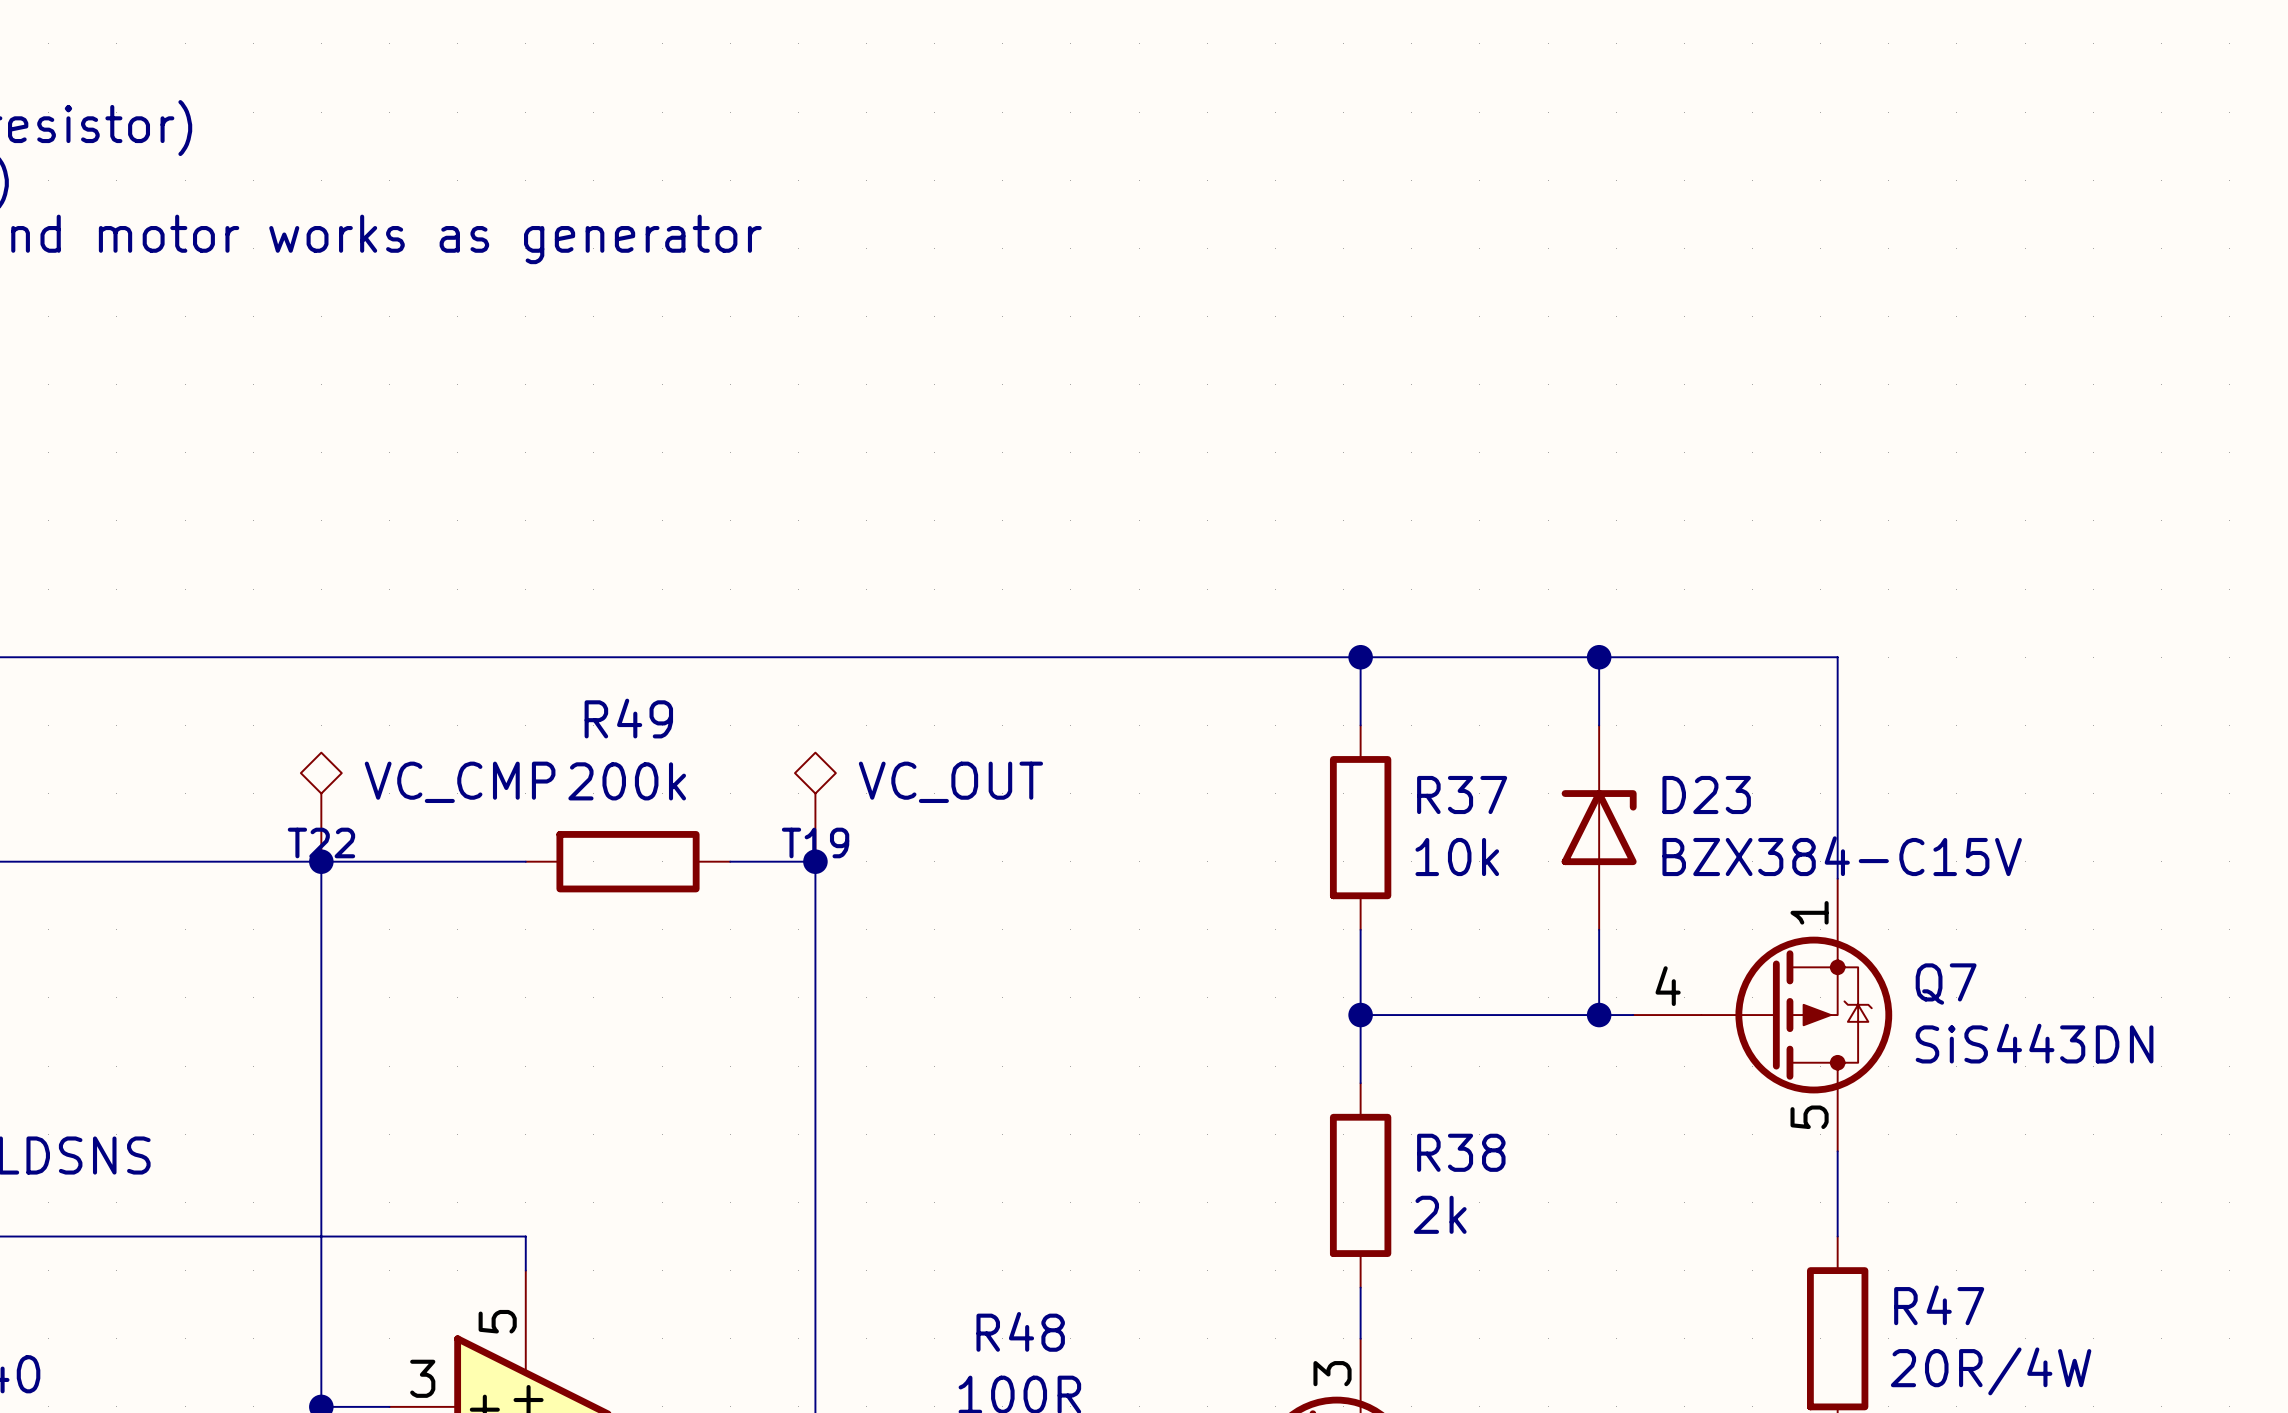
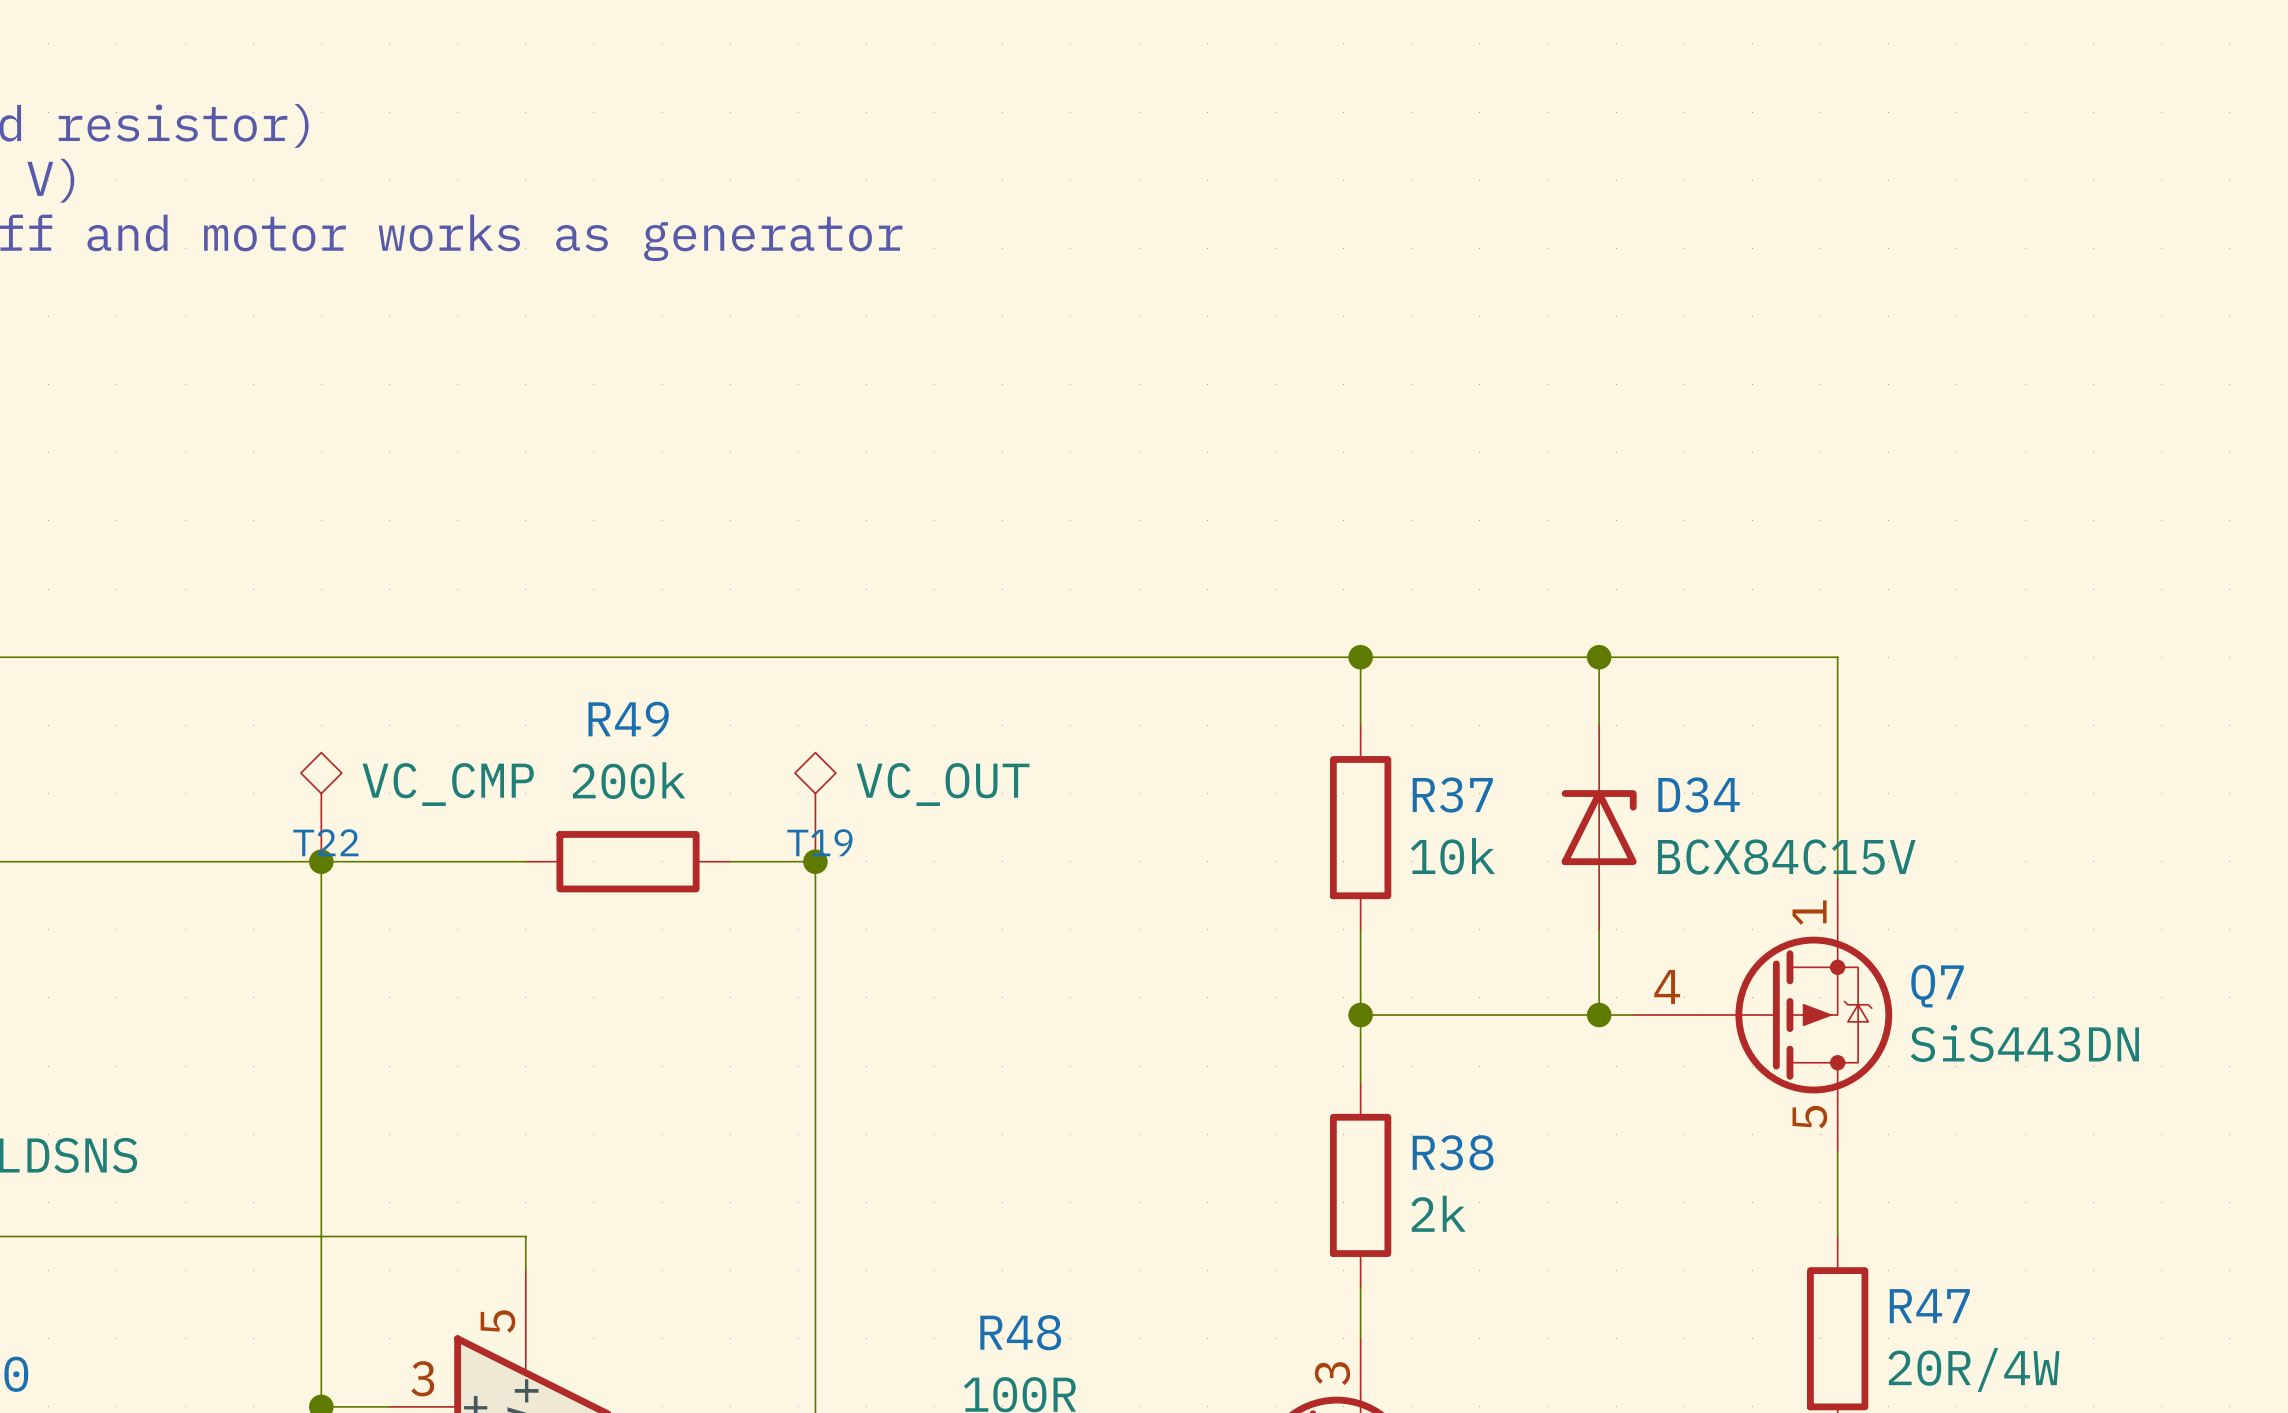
D23 name: D23 (1706, 795) -> D34 (1698, 795)
D23 value: BZX384-C15V (1842, 856) -> BCX84C15V (1786, 857)

